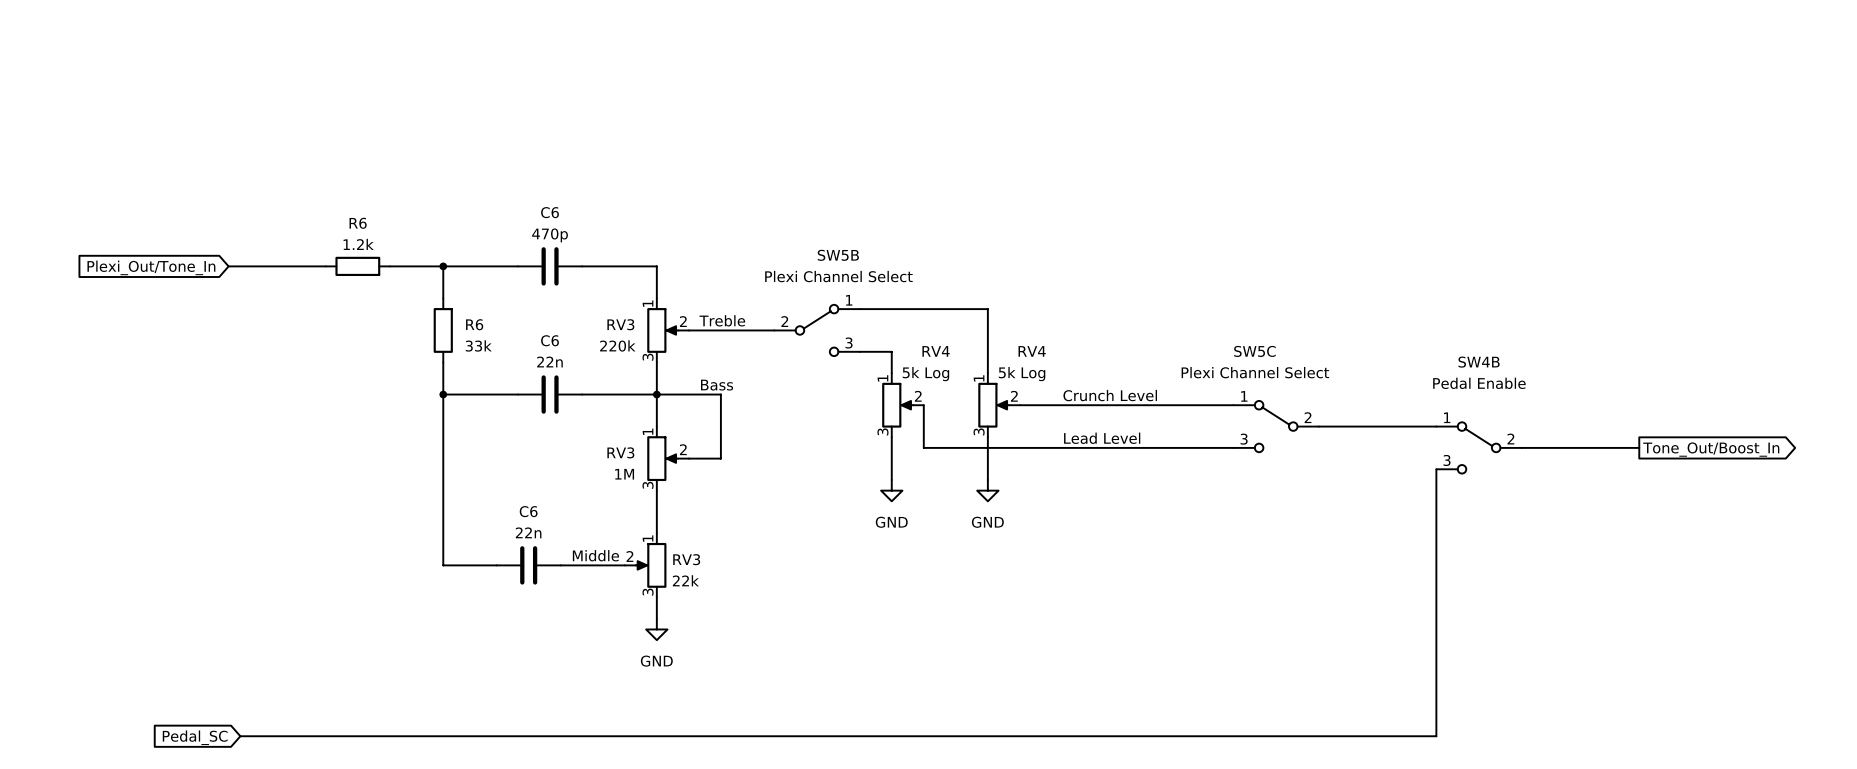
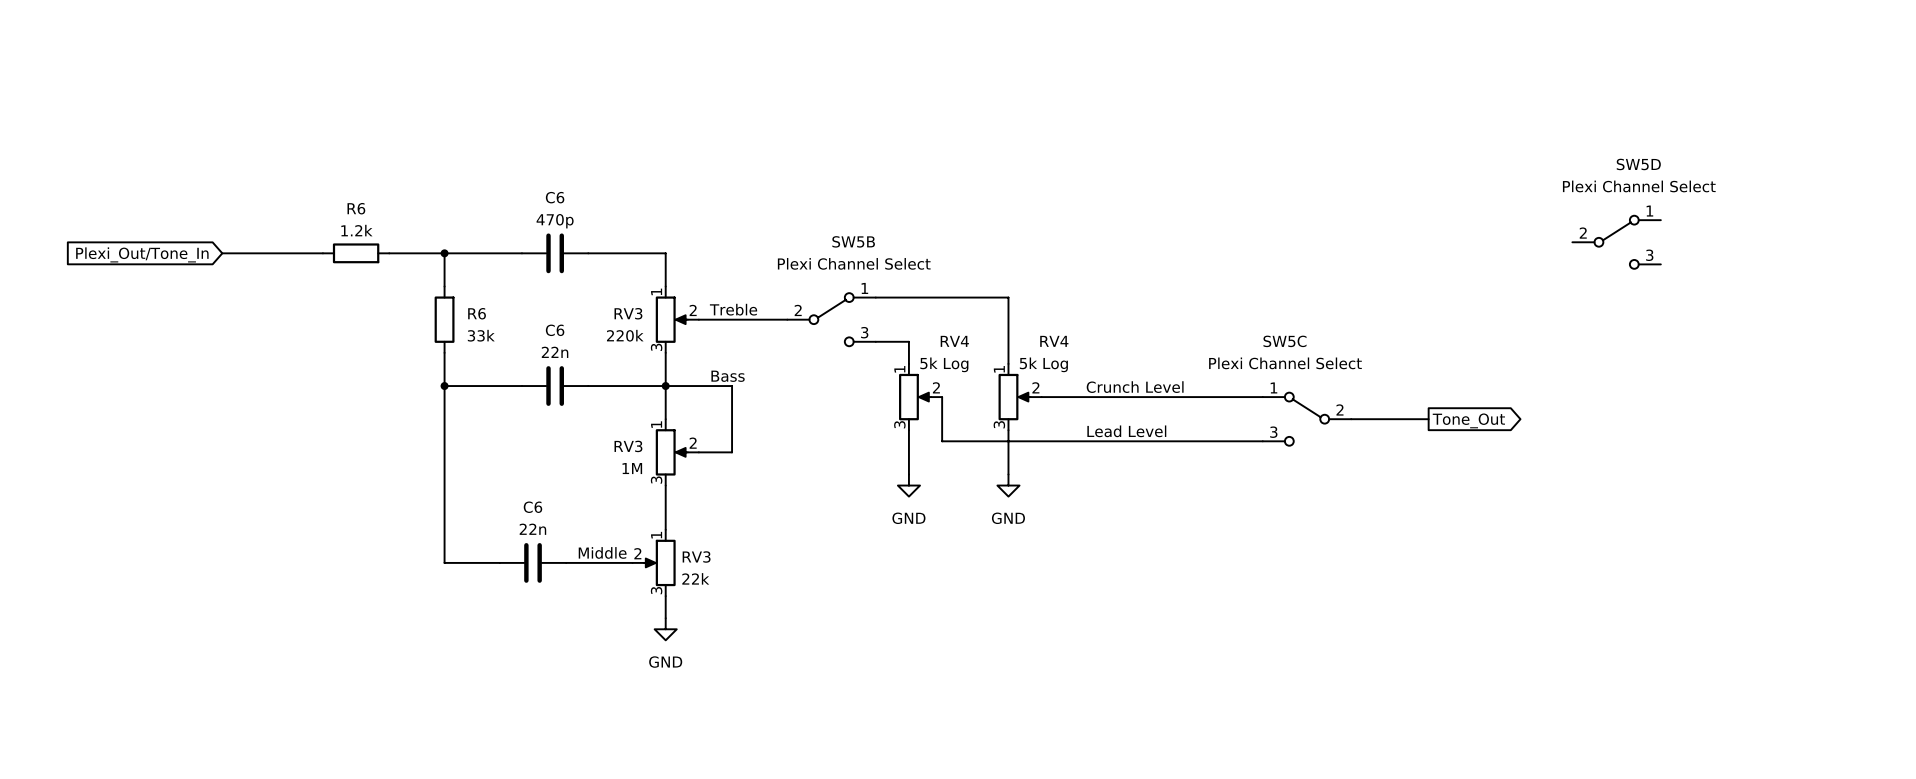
SW5D: none -> Plexi Channel Select (1616, 242)
wire: (1393, 426) (1436, 426) -> none
global label: none -> Tone_Out (1468, 420)
SW4B: Pedal Enable (1479, 447) -> none
wire: (1521, 447) (1639, 447) -> none
global label: Tone_Out/Boost_In (1711, 449) -> none
wire: (1436, 469) (1436, 736) (240, 736) -> none
global label: Pedal_SC (195, 737) -> none

